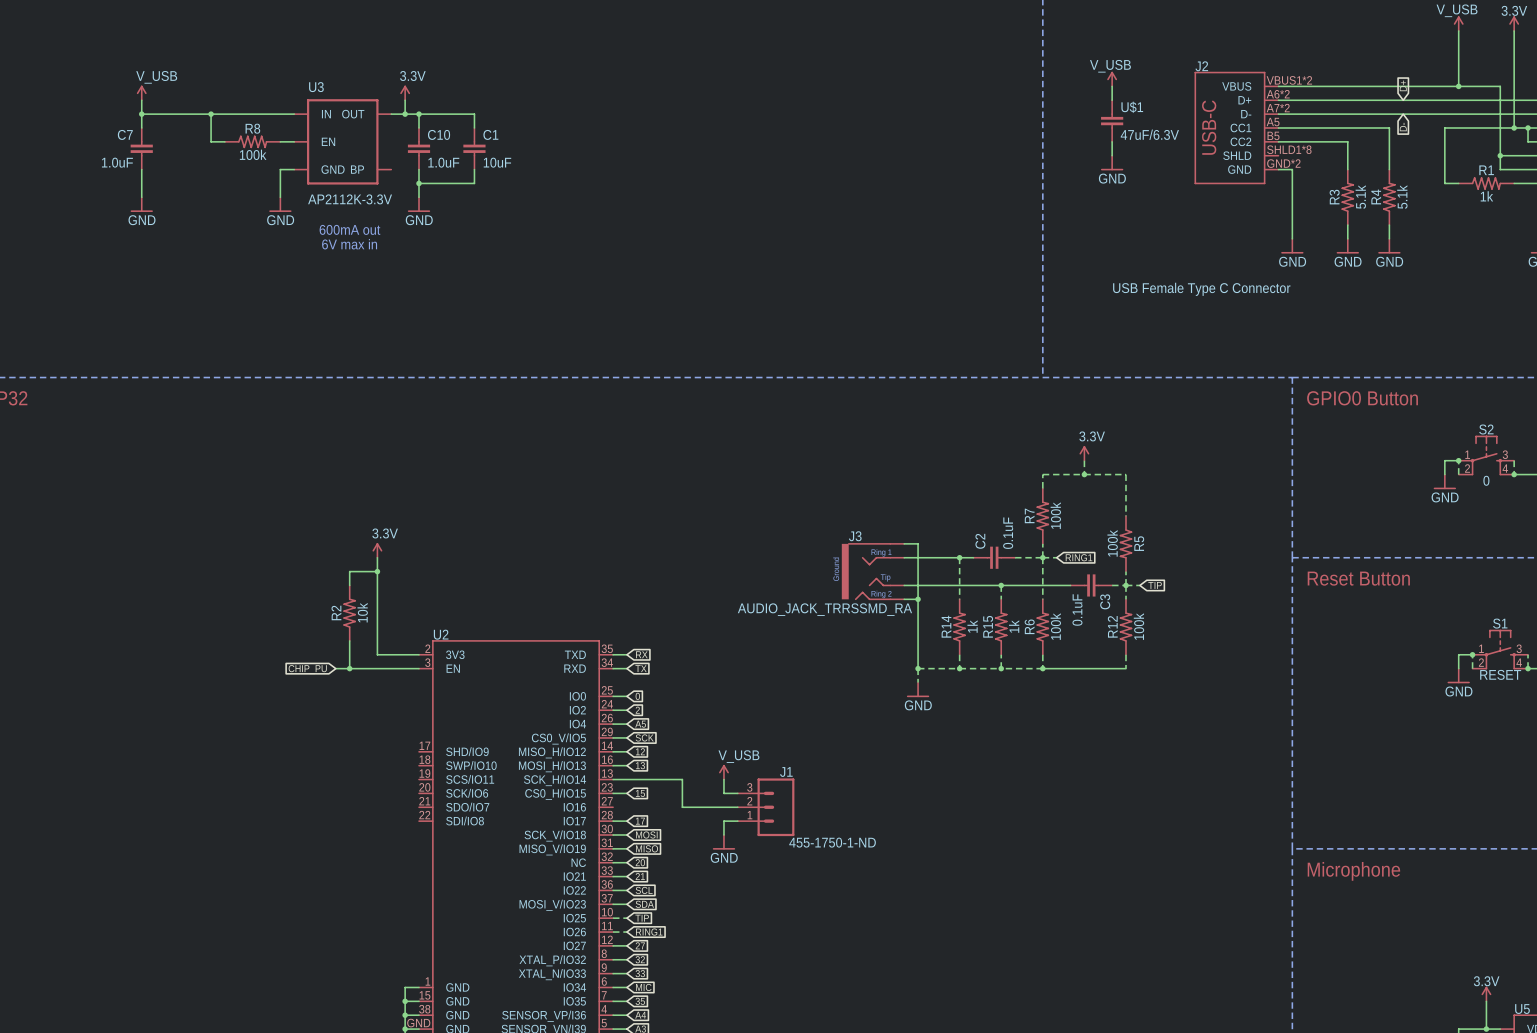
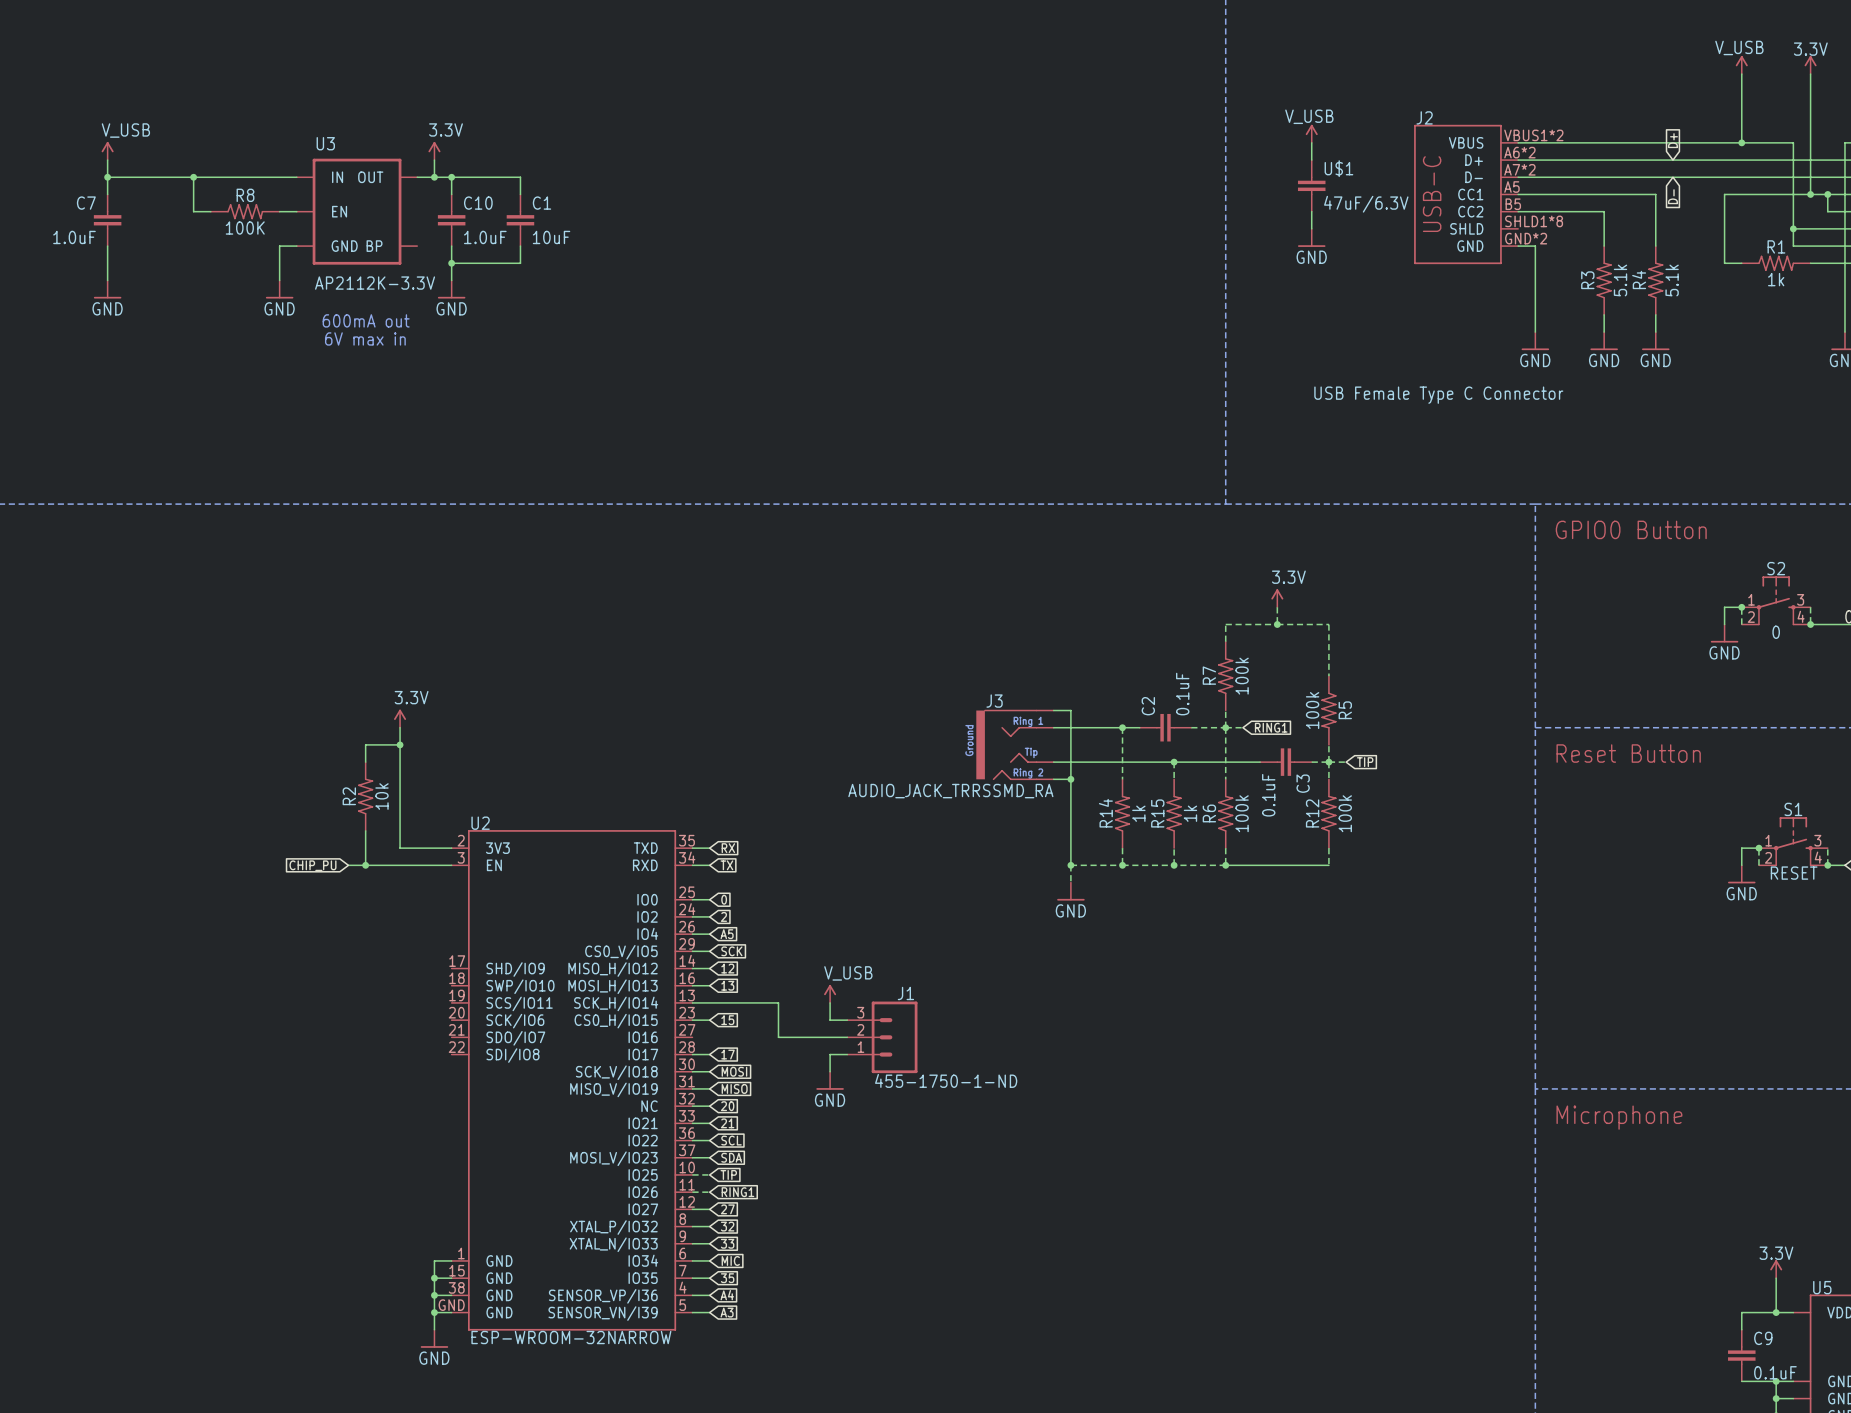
R8 value: 100k (253, 154) -> 100K (245, 228)

